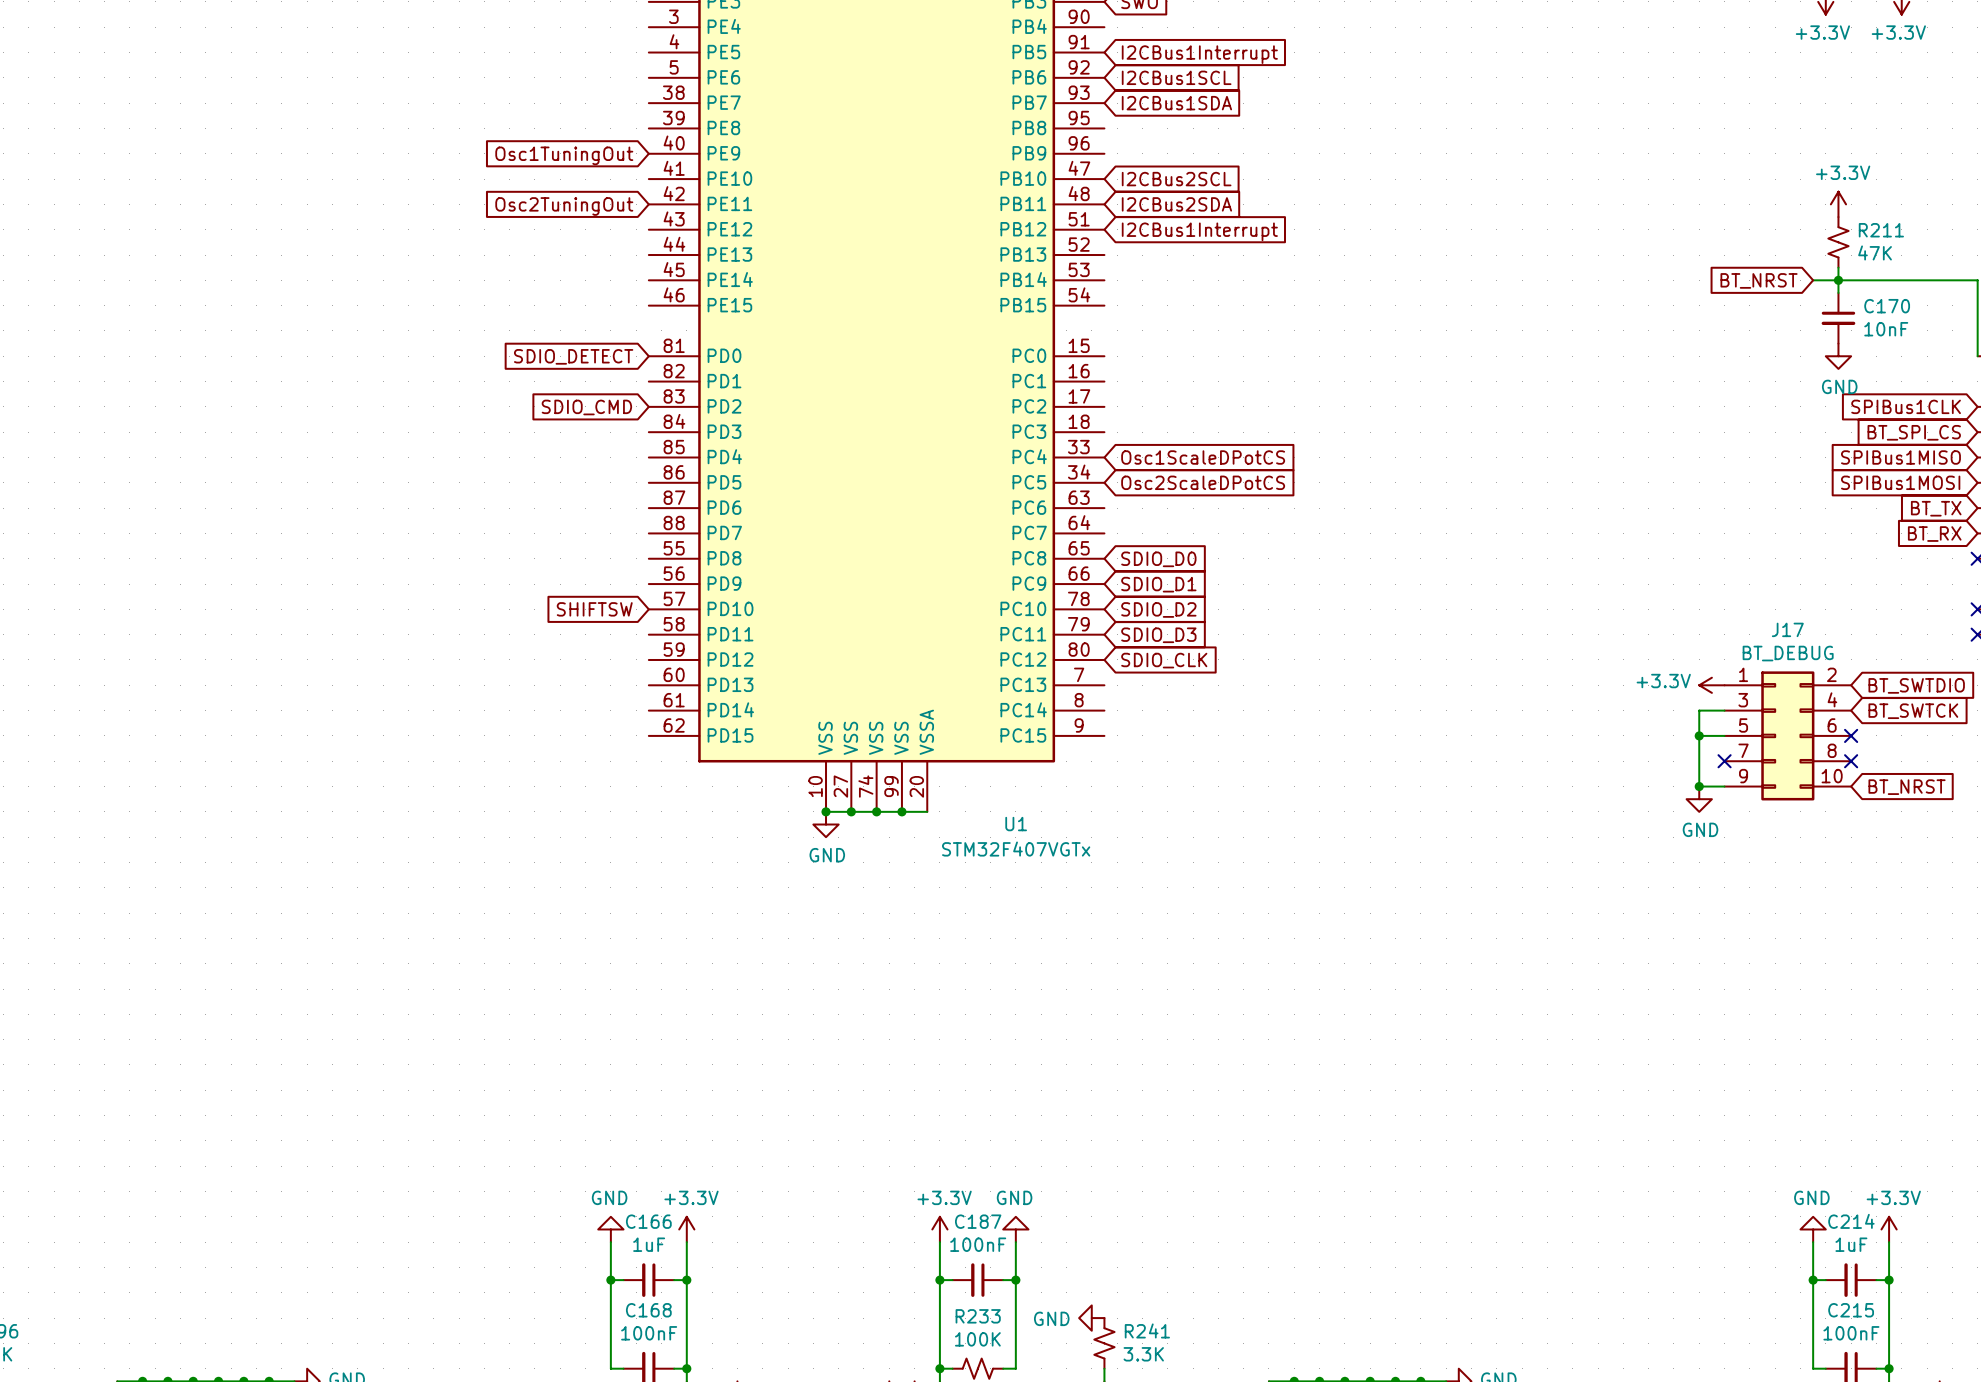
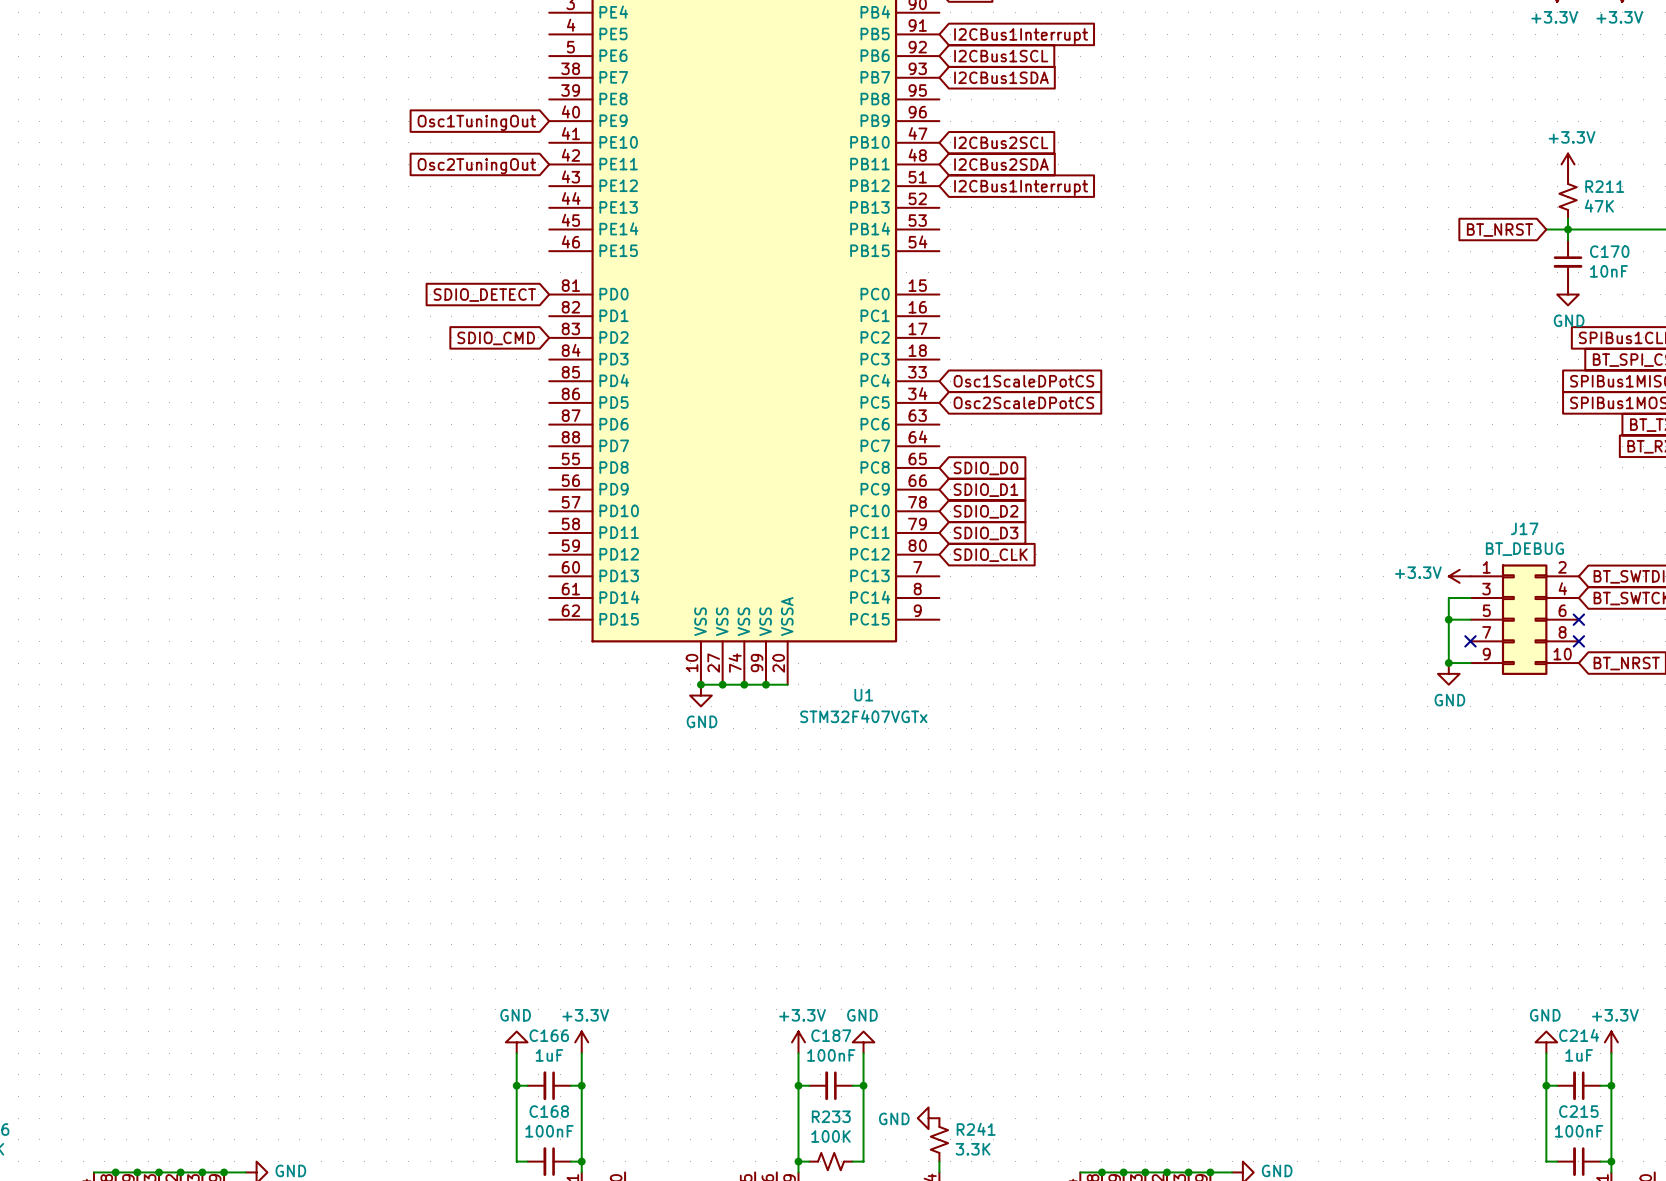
global label: SHIFTSW (594, 609) -> none

